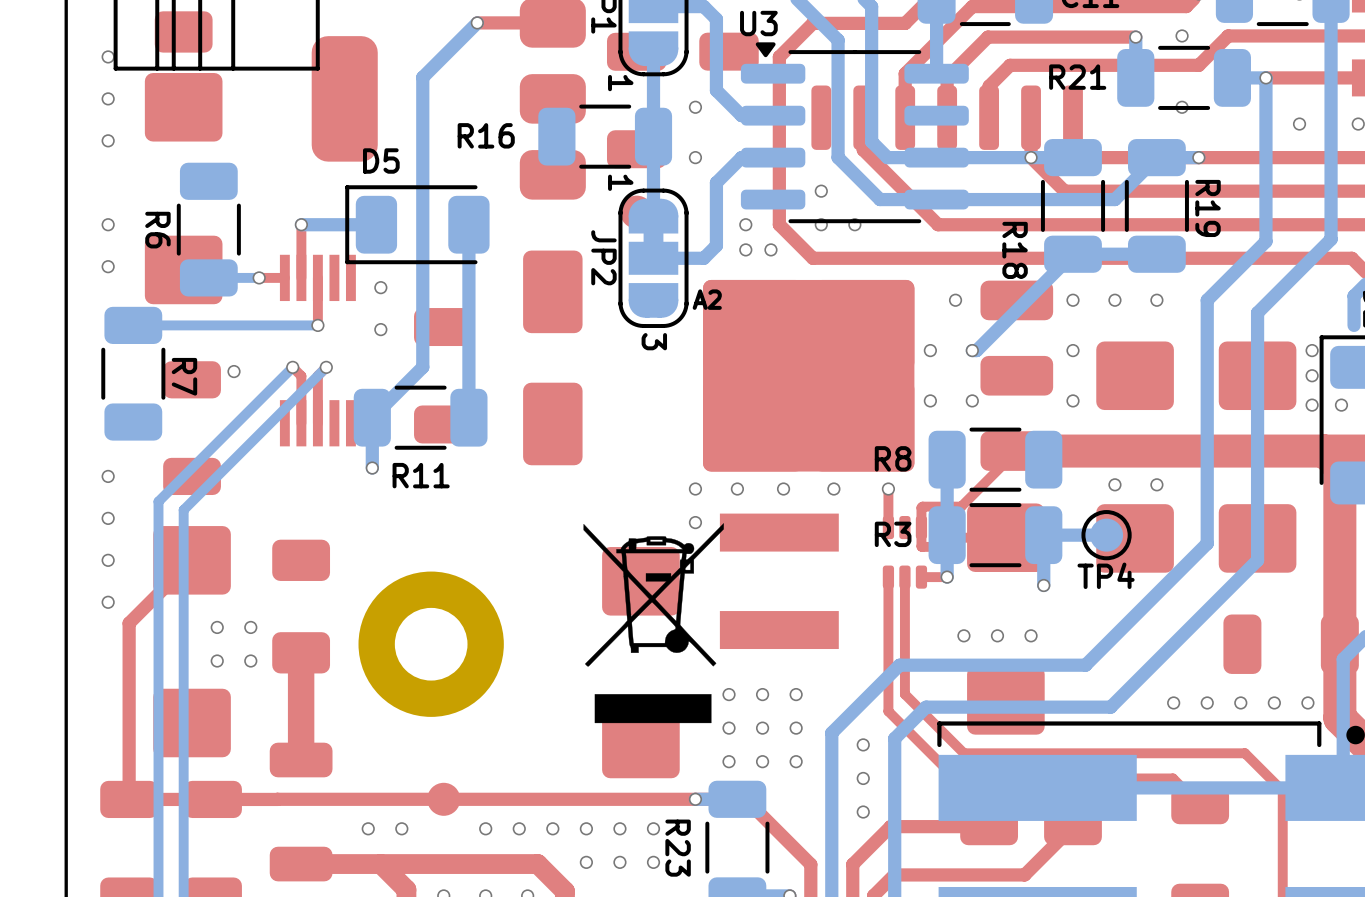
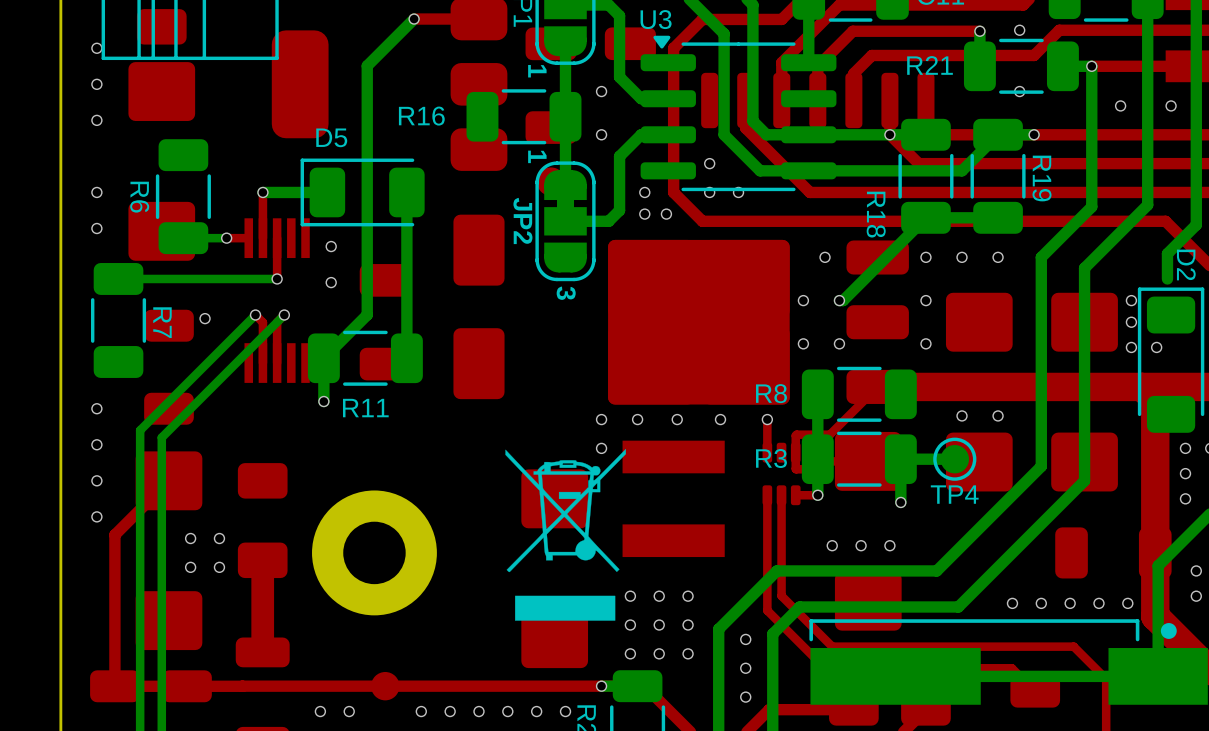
text: A2 (707, 299) -> none

